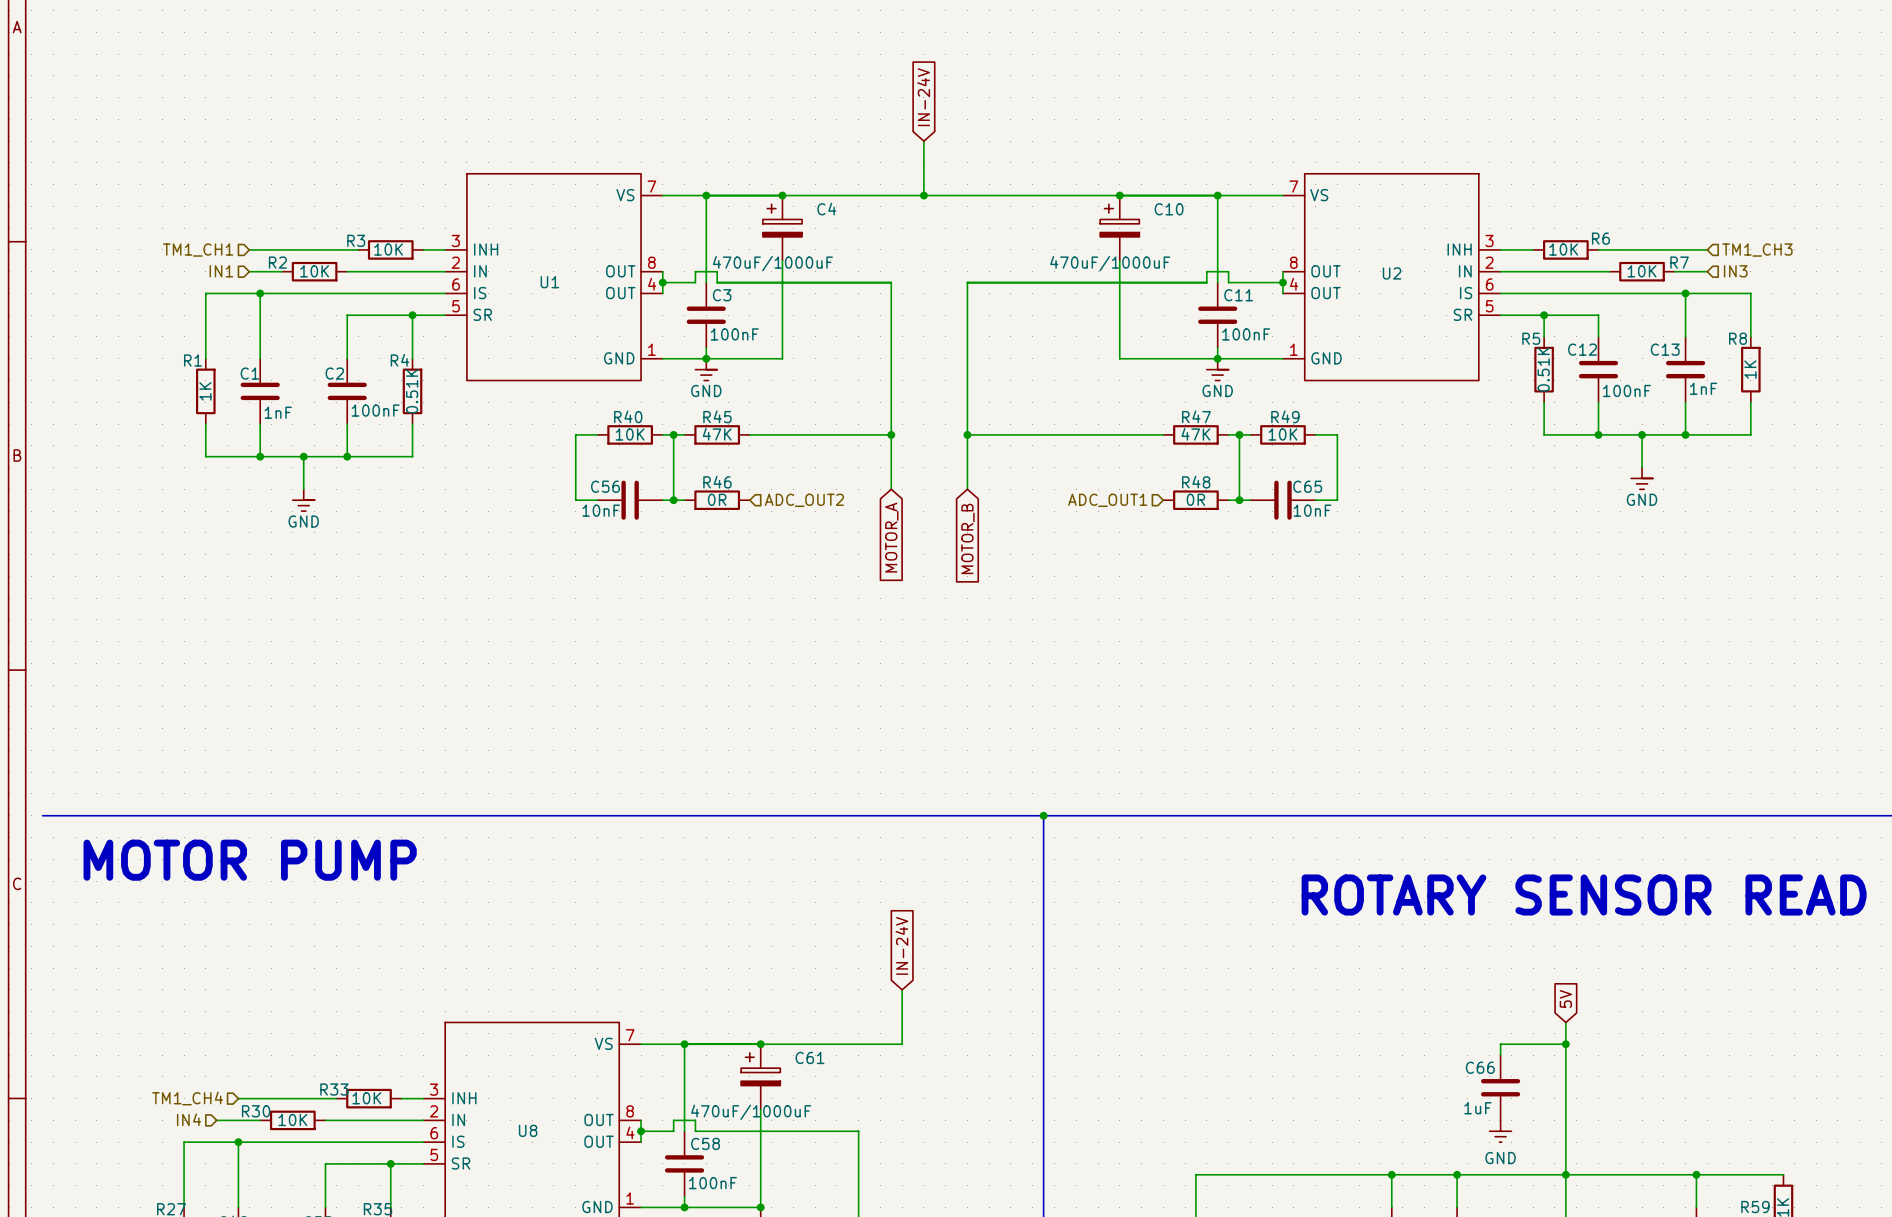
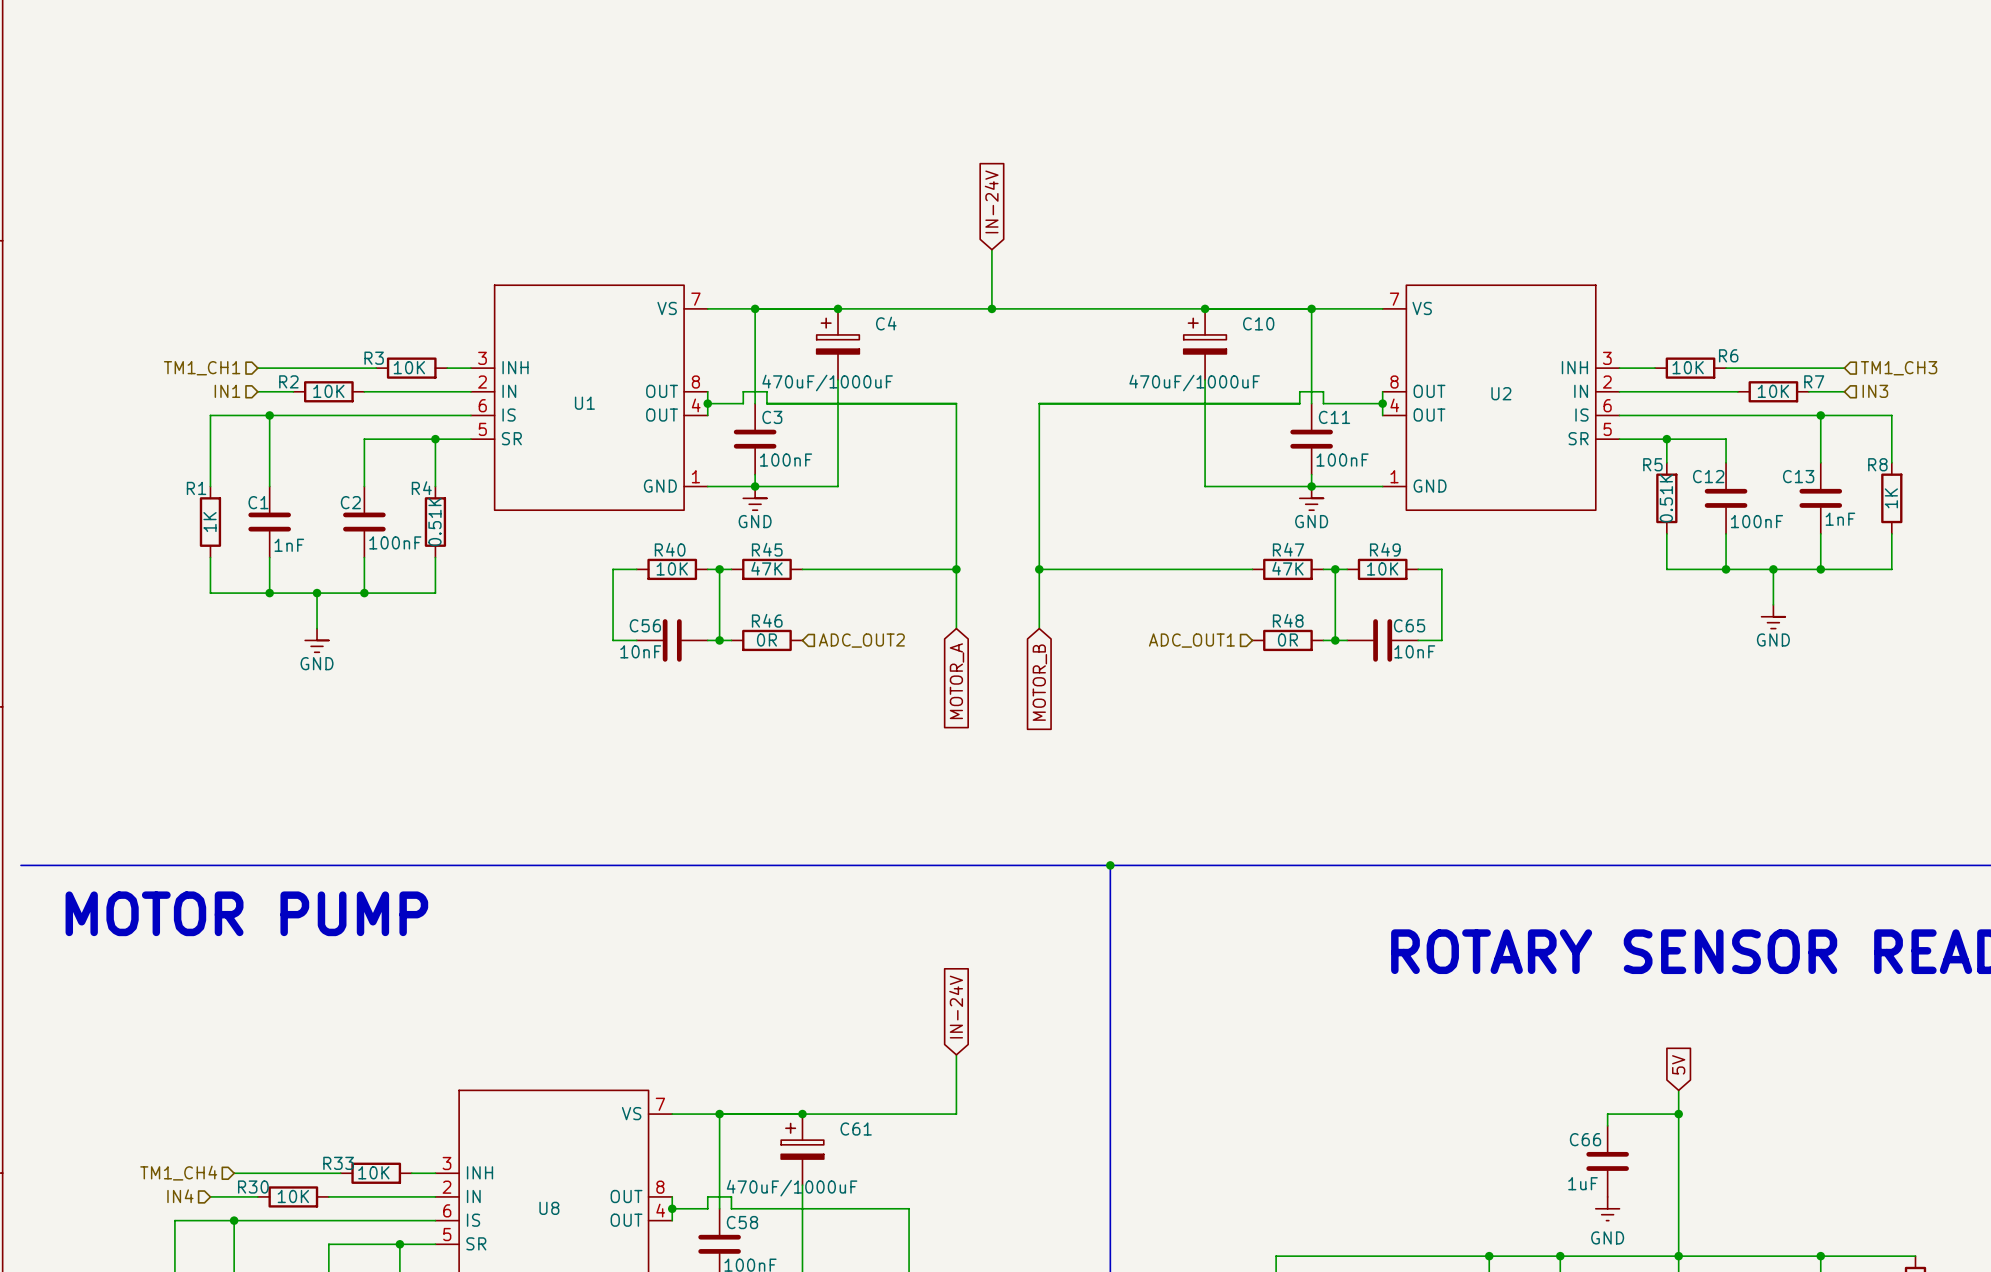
global label position: IN-24V (923, 97) -> IN-24V (991, 201)
wire: (923, 141) (923, 195) -> (991, 249) (991, 308)
wire: (662, 195) (1282, 195) -> (707, 308) (1382, 308)
wire: (706, 195) (706, 282) -> (755, 308) (755, 403)
junction: (706, 195) -> none
junction: (782, 195) -> none
junction: (923, 195) -> none
junction: (1119, 195) -> none
wire: (1217, 195) (1217, 282) -> (1311, 308) (1311, 403)
junction: (1217, 195) -> none
C4 position: (782, 228) -> (838, 344)
C10 position: (1119, 228) -> (1205, 344)
wire: (249, 249) (358, 249) -> none
R3 position: (390, 249) -> (411, 368)
wire: (423, 249) (445, 249) -> (447, 368) (470, 368)
wire: (1500, 249) (1533, 249) -> (1619, 368) (1655, 368)
R6 position: (1565, 249) -> (1690, 368)
wire: (1598, 249) (1707, 249) -> (1726, 368) (1844, 368)
hierarchical label position: TM1_CH1 (198, 250) -> TM1_CH1 (202, 368)
hierarchical label position: TM1_CH3 (1757, 250) -> TM1_CH3 (1899, 368)
wire: (782, 260) (782, 358) (662, 358) -> (838, 379) (838, 486) (707, 486)
wire: (1119, 260) (1119, 358) (1282, 358) -> (1205, 379) (1205, 486) (1382, 486)
hierarchical label position: IN1 (221, 271) -> IN1 (227, 391)
wire: (249, 271) (281, 271) -> (257, 391) (293, 391)
R2 position: (314, 271) -> (328, 391)
wire: (347, 271) (445, 271) -> (364, 391) (470, 391)
wire: (662, 271) (662, 293) -> (707, 391) (707, 415)
wire: (1282, 271) (1282, 293) -> (1382, 391) (1382, 415)
wire: (1500, 271) (1609, 271) -> (1619, 391) (1737, 391)
R7 position: (1642, 271) -> (1773, 391)
wire: (1674, 271) (1707, 271) -> (1808, 391) (1844, 391)
hierarchical label position: IN3 (1735, 271) -> IN3 (1875, 391)
U1 position: (553, 277) -> (589, 397)
U2 position: (1391, 277) -> (1501, 397)
wire: (662, 282) (695, 282) (695, 271) (717, 271) (717, 282) (891, 282) (891, 489) -> (707, 403) (743, 403) (743, 391) (766, 391) (766, 403) (956, 403) (956, 628)
junction: (662, 282) -> none
wire: (1282, 282) (1228, 282) (1228, 271) (1206, 271) (1206, 282) (967, 282) (967, 489) -> (1382, 403) (1323, 403) (1323, 391) (1299, 391) (1299, 403) (1039, 403) (1039, 628)
junction: (1282, 282) -> none
wire: (260, 293) (260, 358) -> (376, 368) (257, 368)
junction: (260, 293) -> none
wire: (445, 293) (205, 293) (205, 358) -> (470, 415) (210, 415) (210, 486)
wire: (1500, 293) (1750, 293) (1750, 336) -> (1619, 415) (1891, 415) (1891, 462)
wire: (1685, 293) (1685, 336) -> (1820, 415) (1820, 462)
junction: (1685, 293) -> none
junction: none -> (755, 308)
junction: none -> (838, 308)
junction: none -> (991, 308)
junction: none -> (1205, 308)
junction: none -> (1311, 308)
wire: (412, 315) (412, 358) -> (435, 439) (435, 486)
junction: (412, 315) -> none
wire: (445, 315) (347, 315) (347, 358) -> (470, 439) (364, 439) (364, 486)
C3 position: (706, 315) -> (755, 439)
C11 position: (1217, 315) -> (1311, 439)
wire: (1500, 315) (1598, 315) (1598, 336) -> (1619, 439) (1726, 439) (1726, 462)
wire: (1544, 315) (1544, 336) -> (1666, 439) (1666, 462)
junction: (1544, 315) -> none
wire: (706, 347) (706, 358) -> (755, 474) (755, 486)
wire: (1217, 347) (1217, 358) -> (1311, 474) (1311, 486)
junction: (706, 358) -> none
junction: (1217, 358) -> none
power symbol position: GND (706, 369) -> GND (755, 498)
power symbol position: GND (1217, 369) -> GND (1311, 498)
R5 position: (1544, 369) -> (1666, 498)
C12 position: (1598, 369) -> (1726, 498)
C13 position: (1685, 369) -> (1820, 498)
R8 position: (1750, 369) -> (1891, 498)
R1 position: (205, 391) -> (210, 522)
C1 position: (260, 391) -> (269, 522)
C2 position: (347, 391) -> (364, 522)
R4 position: (412, 391) -> (435, 522)
junction: none -> (707, 403)
junction: none -> (1382, 403)
wire: none -> (269, 415) (269, 486)
junction: none -> (269, 415)
wire: (1544, 402) (1544, 434) (1750, 434) (1750, 402) -> (1666, 533) (1666, 569) (1891, 569) (1891, 533)
wire: (1598, 402) (1598, 434) -> (1726, 533) (1726, 569)
wire: (1685, 402) (1685, 434) -> (1820, 533) (1820, 569)
junction: none -> (1820, 415)
wire: (205, 424) (205, 456) (412, 456) (412, 424) -> (210, 557) (210, 593) (435, 593) (435, 557)
wire: (260, 424) (260, 456) -> (269, 557) (269, 593)
wire: (347, 424) (347, 456) -> (364, 557) (364, 593)
junction: none -> (435, 439)
junction: none -> (1666, 439)
wire: (597, 434) (575, 434) (575, 500) (597, 500) -> (636, 569) (613, 569) (613, 640) (636, 640)
R40 position: (630, 434) -> (672, 569)
wire: (662, 434) (684, 434) -> (707, 569) (731, 569)
wire: (673, 434) (673, 500) -> (719, 569) (719, 640)
junction: (673, 434) -> none
R45 position: (717, 434) -> (766, 569)
wire: (749, 434) (891, 434) -> (802, 569) (956, 569)
junction: (891, 434) -> none
wire: (967, 434) (1163, 434) -> (1039, 569) (1252, 569)
junction: (967, 434) -> none
R47 position: (1195, 434) -> (1287, 569)
wire: (1228, 434) (1250, 434) -> (1323, 569) (1347, 569)
wire: (1239, 434) (1239, 500) -> (1335, 569) (1335, 640)
junction: (1239, 434) -> none
R49 position: (1282, 434) -> (1382, 569)
wire: (1315, 434) (1337, 434) (1337, 500) (1315, 500) -> (1418, 569) (1441, 569) (1441, 640) (1418, 640)
junction: (1598, 434) -> none
wire: (1642, 434) (1642, 467) -> (1773, 569) (1773, 604)
junction: (1642, 434) -> none
junction: (1685, 434) -> none
junction: (260, 456) -> none
wire: (303, 456) (303, 489) -> (317, 593) (317, 628)
junction: (303, 456) -> none
junction: (347, 456) -> none
junction: none -> (755, 486)
junction: none -> (1311, 486)
power symbol position: GND (1642, 478) -> GND (1773, 616)
power symbol position: GND (303, 500) -> GND (317, 640)
C56 position: (630, 500) -> (672, 640)
wire: (662, 500) (684, 500) -> (707, 640) (731, 640)
junction: (673, 500) -> none
R46 position: (717, 500) -> (766, 640)
hierarchical label position: ADC_OUT2 (804, 500) -> ADC_OUT2 (861, 640)
hierarchical label position: ADC_OUT1 (1107, 500) -> ADC_OUT1 (1191, 640)
R48 position: (1195, 500) -> (1287, 640)
wire: (1228, 500) (1250, 500) -> (1323, 640) (1347, 640)
junction: (1239, 500) -> none
C65 position: (1282, 500) -> (1382, 640)
global label position: MOTOR_A (891, 537) -> MOTOR_A (956, 681)
global label position: MOTOR_B (967, 538) -> MOTOR_B (1039, 682)
junction: none -> (719, 569)
junction: none -> (956, 569)
junction: none -> (1039, 569)
junction: none -> (1335, 569)
junction: none -> (1726, 569)
junction: none -> (1773, 569)
junction: none -> (1820, 569)
junction: none -> (269, 593)
junction: none -> (317, 593)
junction: none -> (364, 593)
junction: none -> (719, 640)
junction: none -> (1335, 640)

